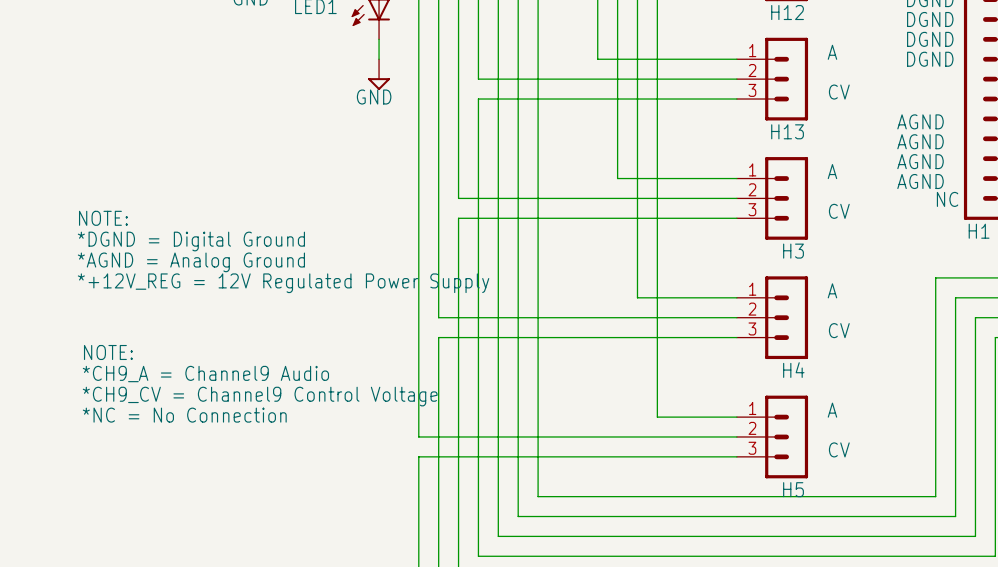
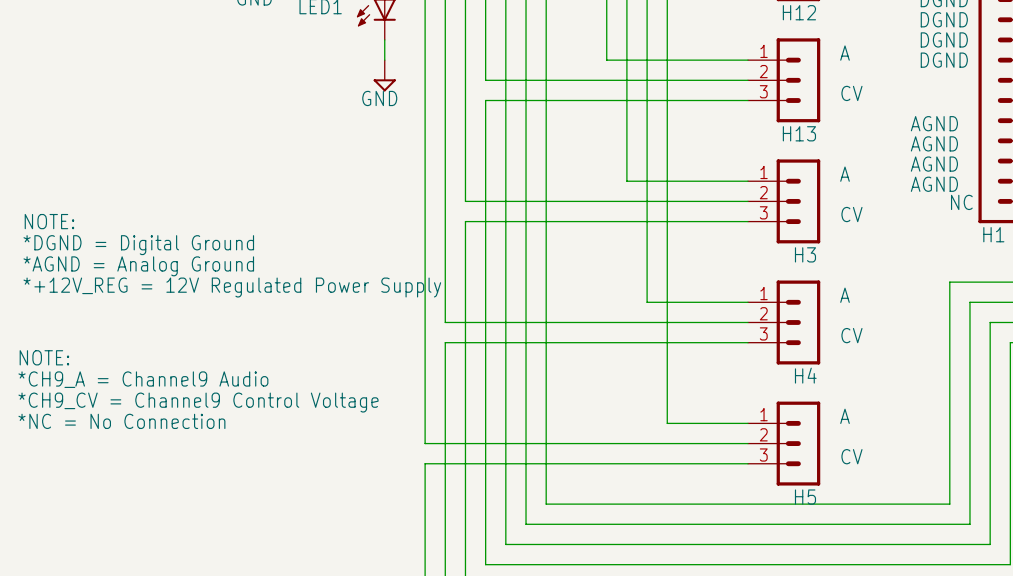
text position: NOTE: (103, 218) -> NOTE: (49, 221)
text position: *DGND = Digital Ground (191, 241) -> *DGND = Digital Ground (138, 245)
text position: *AGND = Analog Ground (191, 262) -> *AGND = Analog Ground (138, 266)
text position: *+12V_REG = 12V Regulated Power Supply (283, 283) -> *+12V_REG = 12V Regulated Power Supply (232, 287)
text position: NOTE: (108, 352) -> NOTE: (44, 357)
text position: *CH9_A = Channel9 Audio (205, 374) -> *CH9_A = Channel9 Audio (143, 379)
text position: *CH9_CV = Channel9 Control Voltage (260, 396) -> *CH9_CV = Channel9 Control Voltage (198, 402)
text position: *NC = No Connection (184, 415) -> *NC = No Connection (121, 421)

